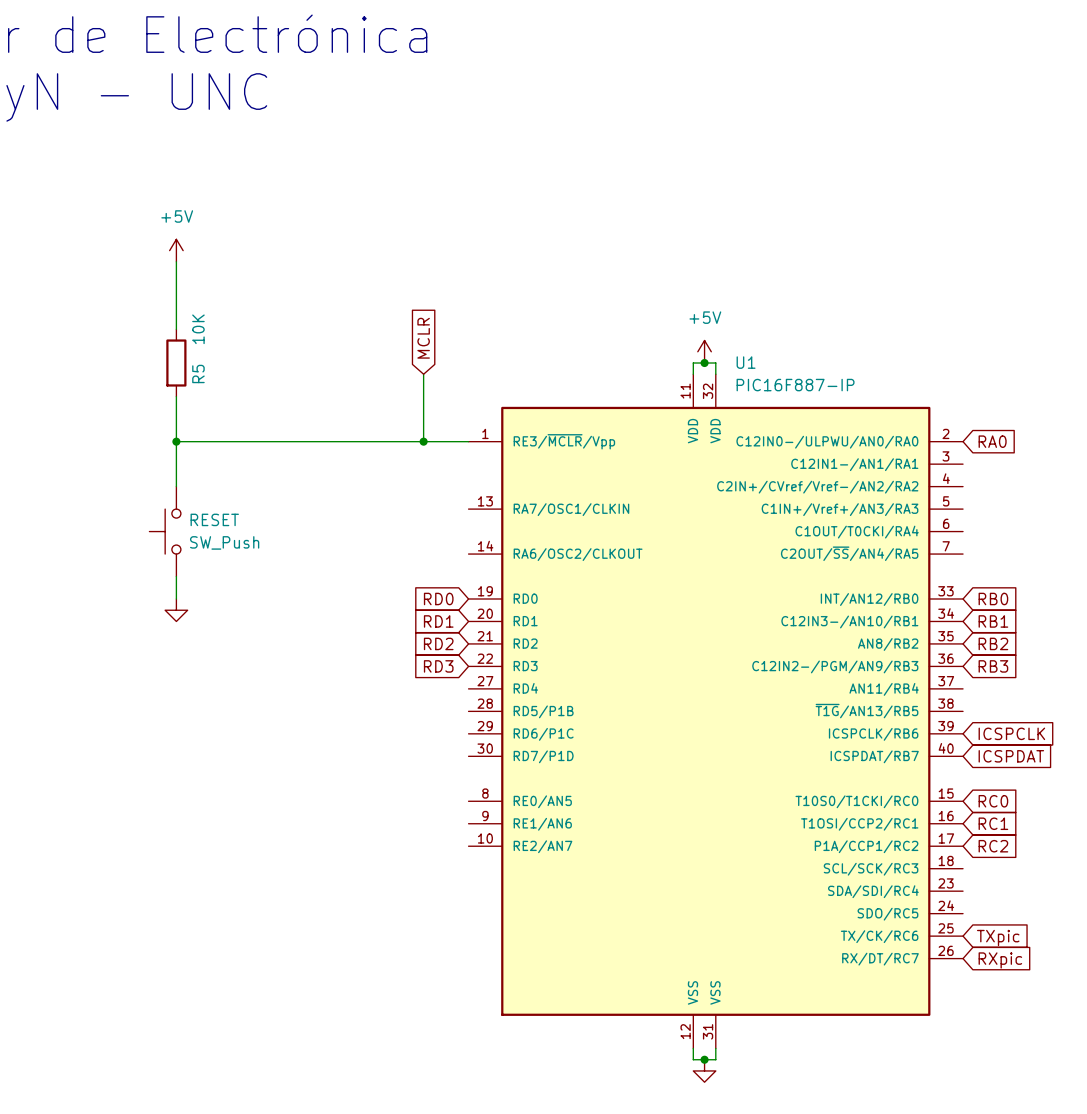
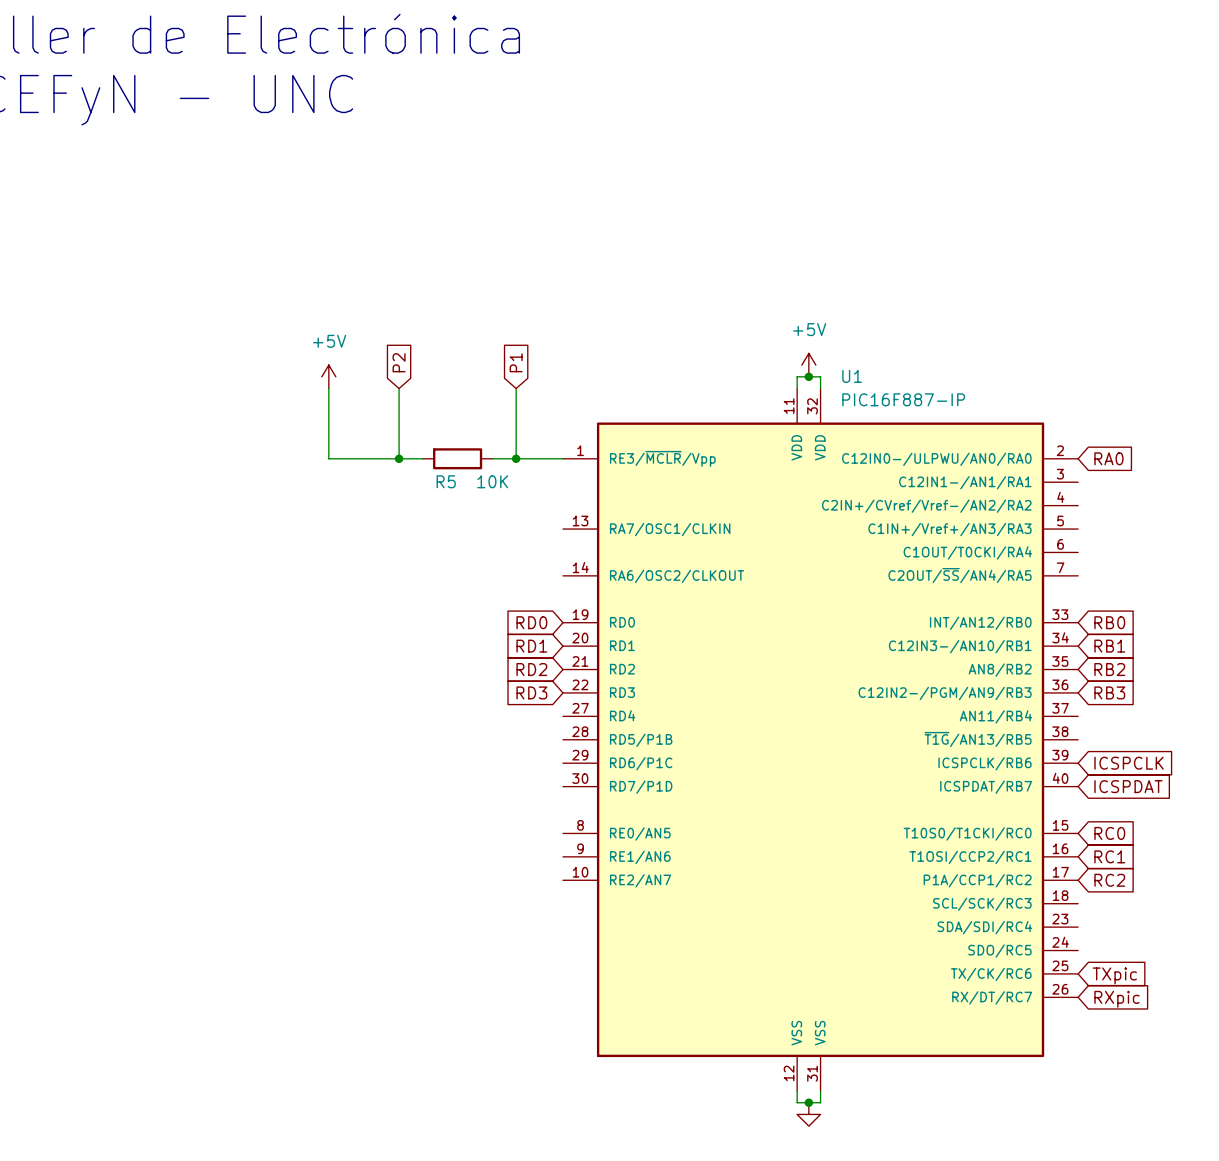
power symbol position: +5V (176, 250) -> +5V (328, 376)
wire: (176, 261) (176, 329) -> (399, 388) (399, 458)
global label: MCLR (423, 338) -> P1 (516, 362)
global label: none -> P2 (399, 362)
R5 rotation: 0° (176, 363) -> 90° clockwise (457, 458)
R5 position: (176, 363) -> (457, 458)
wire: (176, 396) (176, 486) -> none
wire: (176, 441) (243, 441) -> (328, 388) (328, 458)
junction: (176, 441) -> none
junction: none -> (399, 458)
wire: (333, 441) (401, 441) -> none
RESET: SW_Push (165, 531) -> none
wire: (176, 576) (176, 598) -> none
power symbol: (176, 610) -> none

